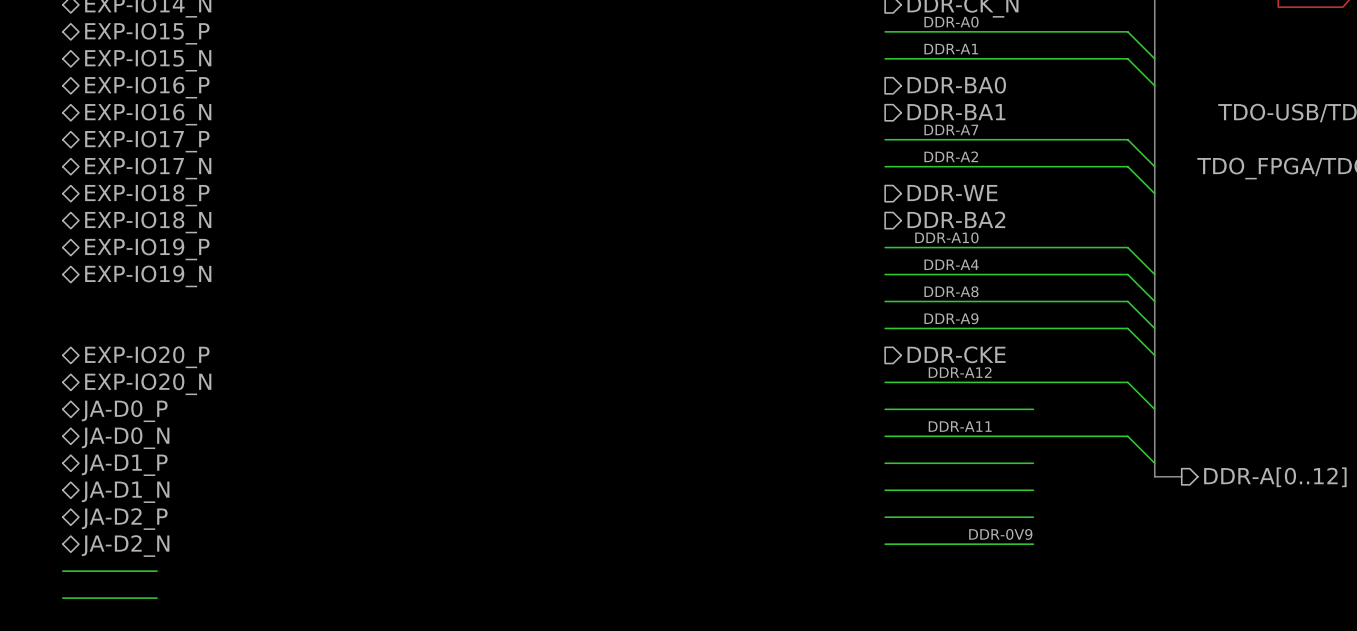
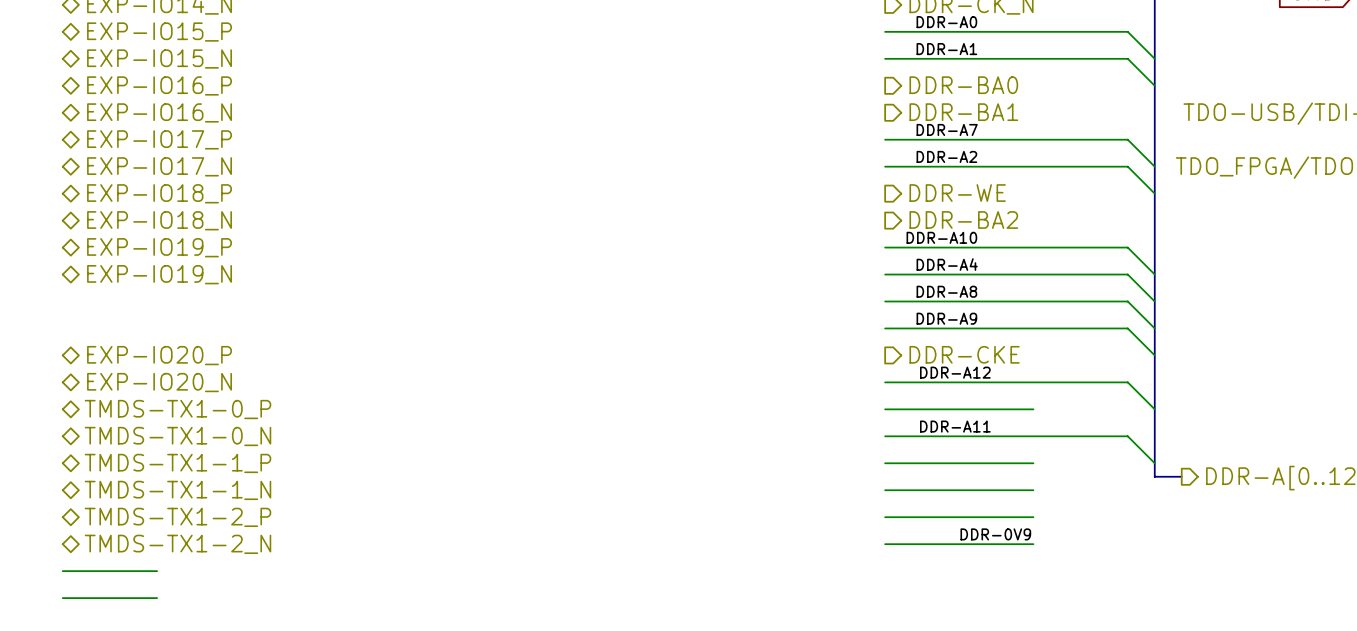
hierarchical label: JA-D0_P (124, 411) -> TMDS-TX1-0_P (178, 409)
hierarchical label: JA-D0_N (125, 438) -> TMDS-TX1-0_N (178, 436)
hierarchical label: JA-D1_P (124, 465) -> TMDS-TX1-1_P (178, 463)
hierarchical label: JA-D1_N (125, 492) -> TMDS-TX1-1_N (178, 490)
hierarchical label: JA-D2_P (124, 519) -> TMDS-TX1-2_P (178, 517)
hierarchical label: JA-D2_N (125, 546) -> TMDS-TX1-2_N (178, 544)

